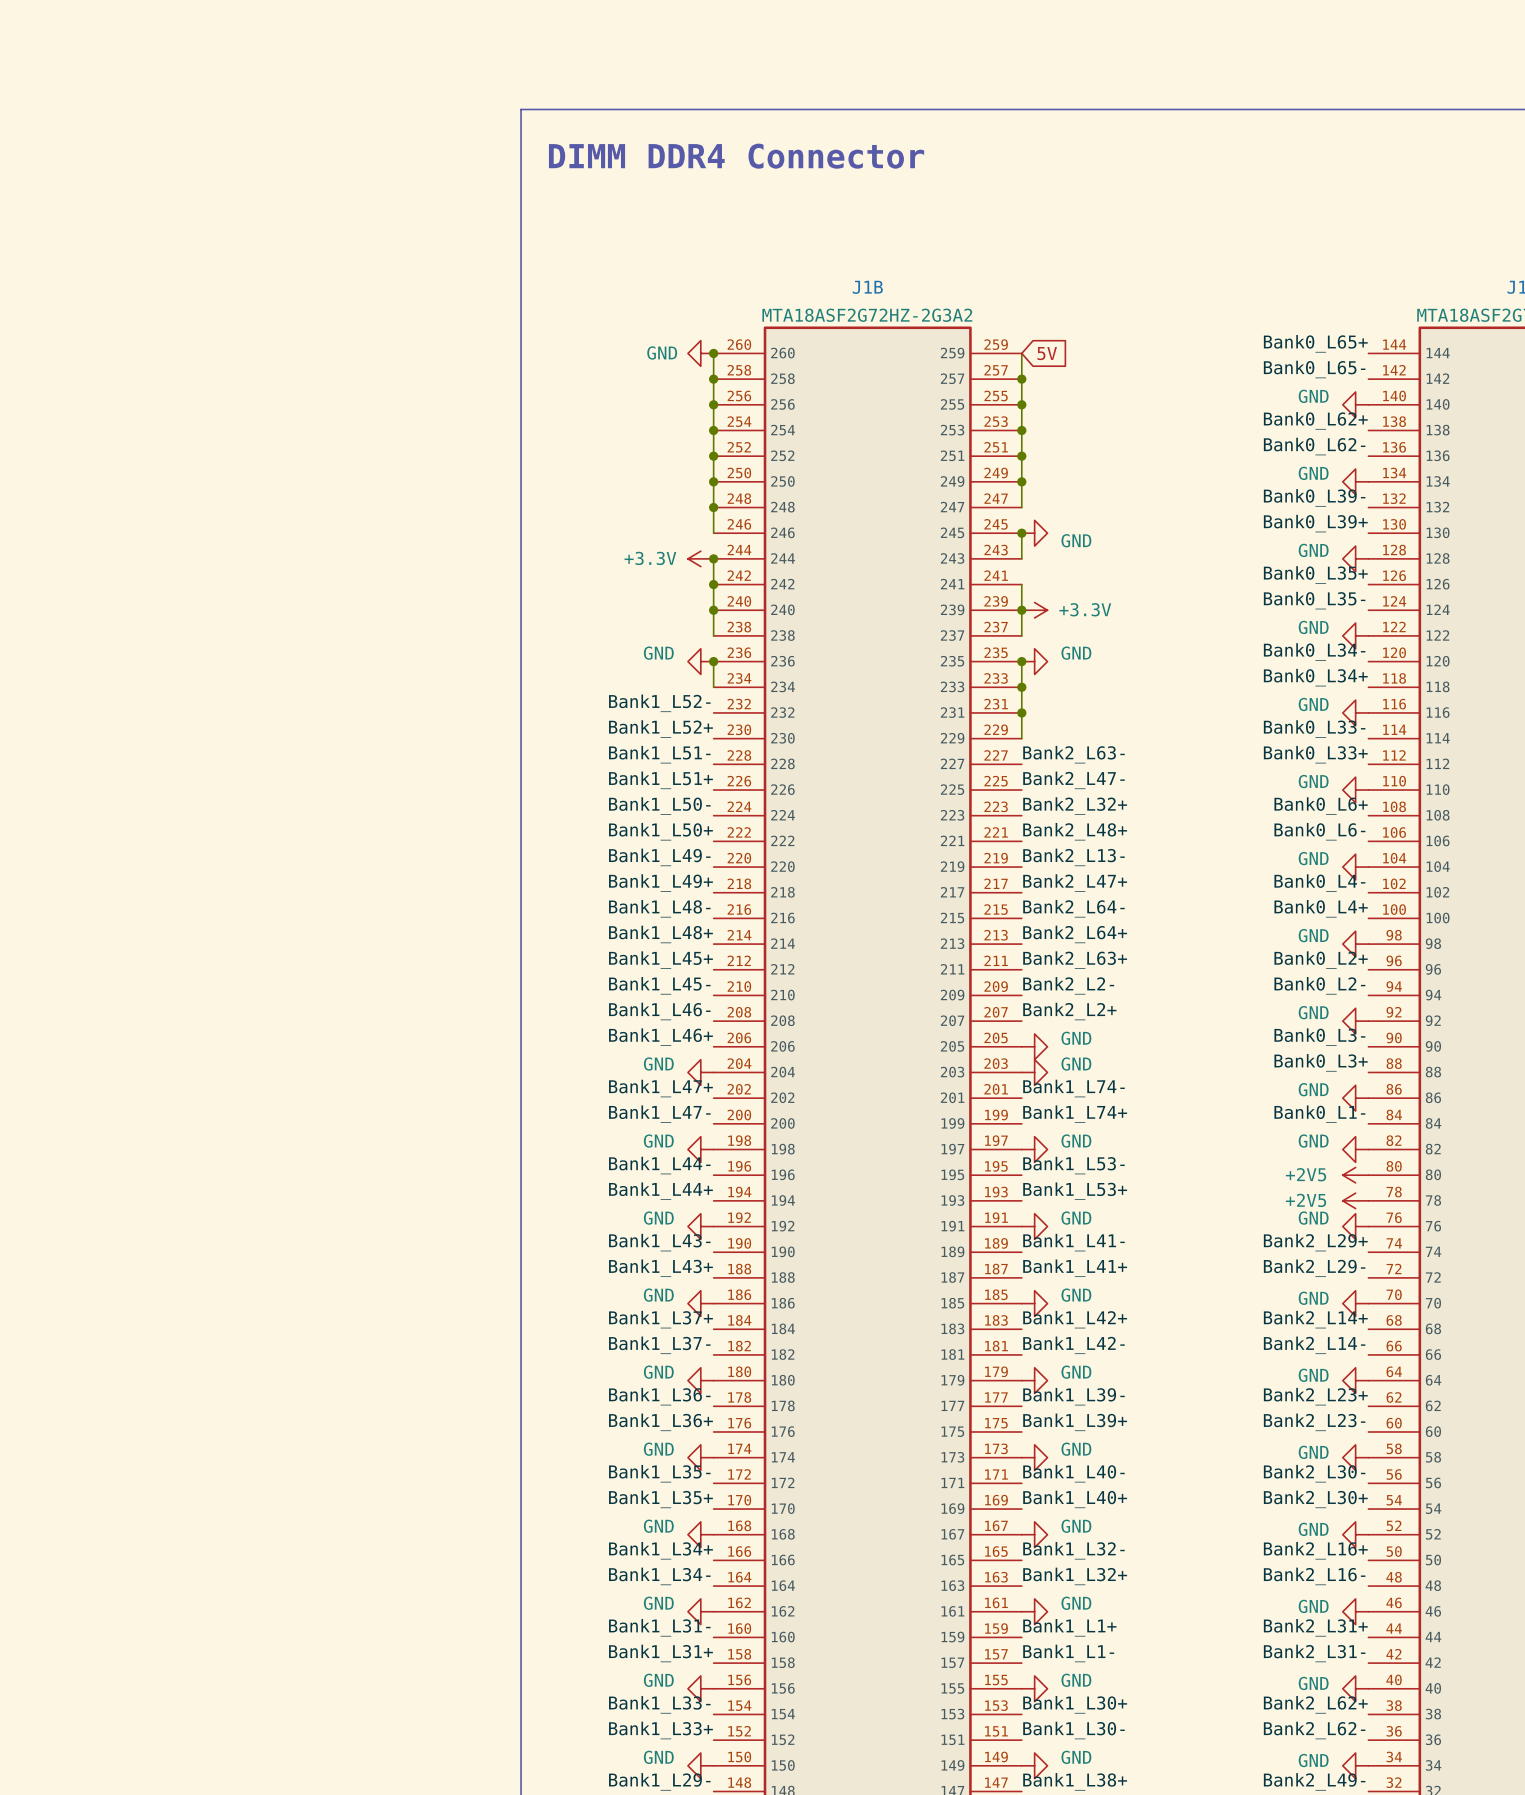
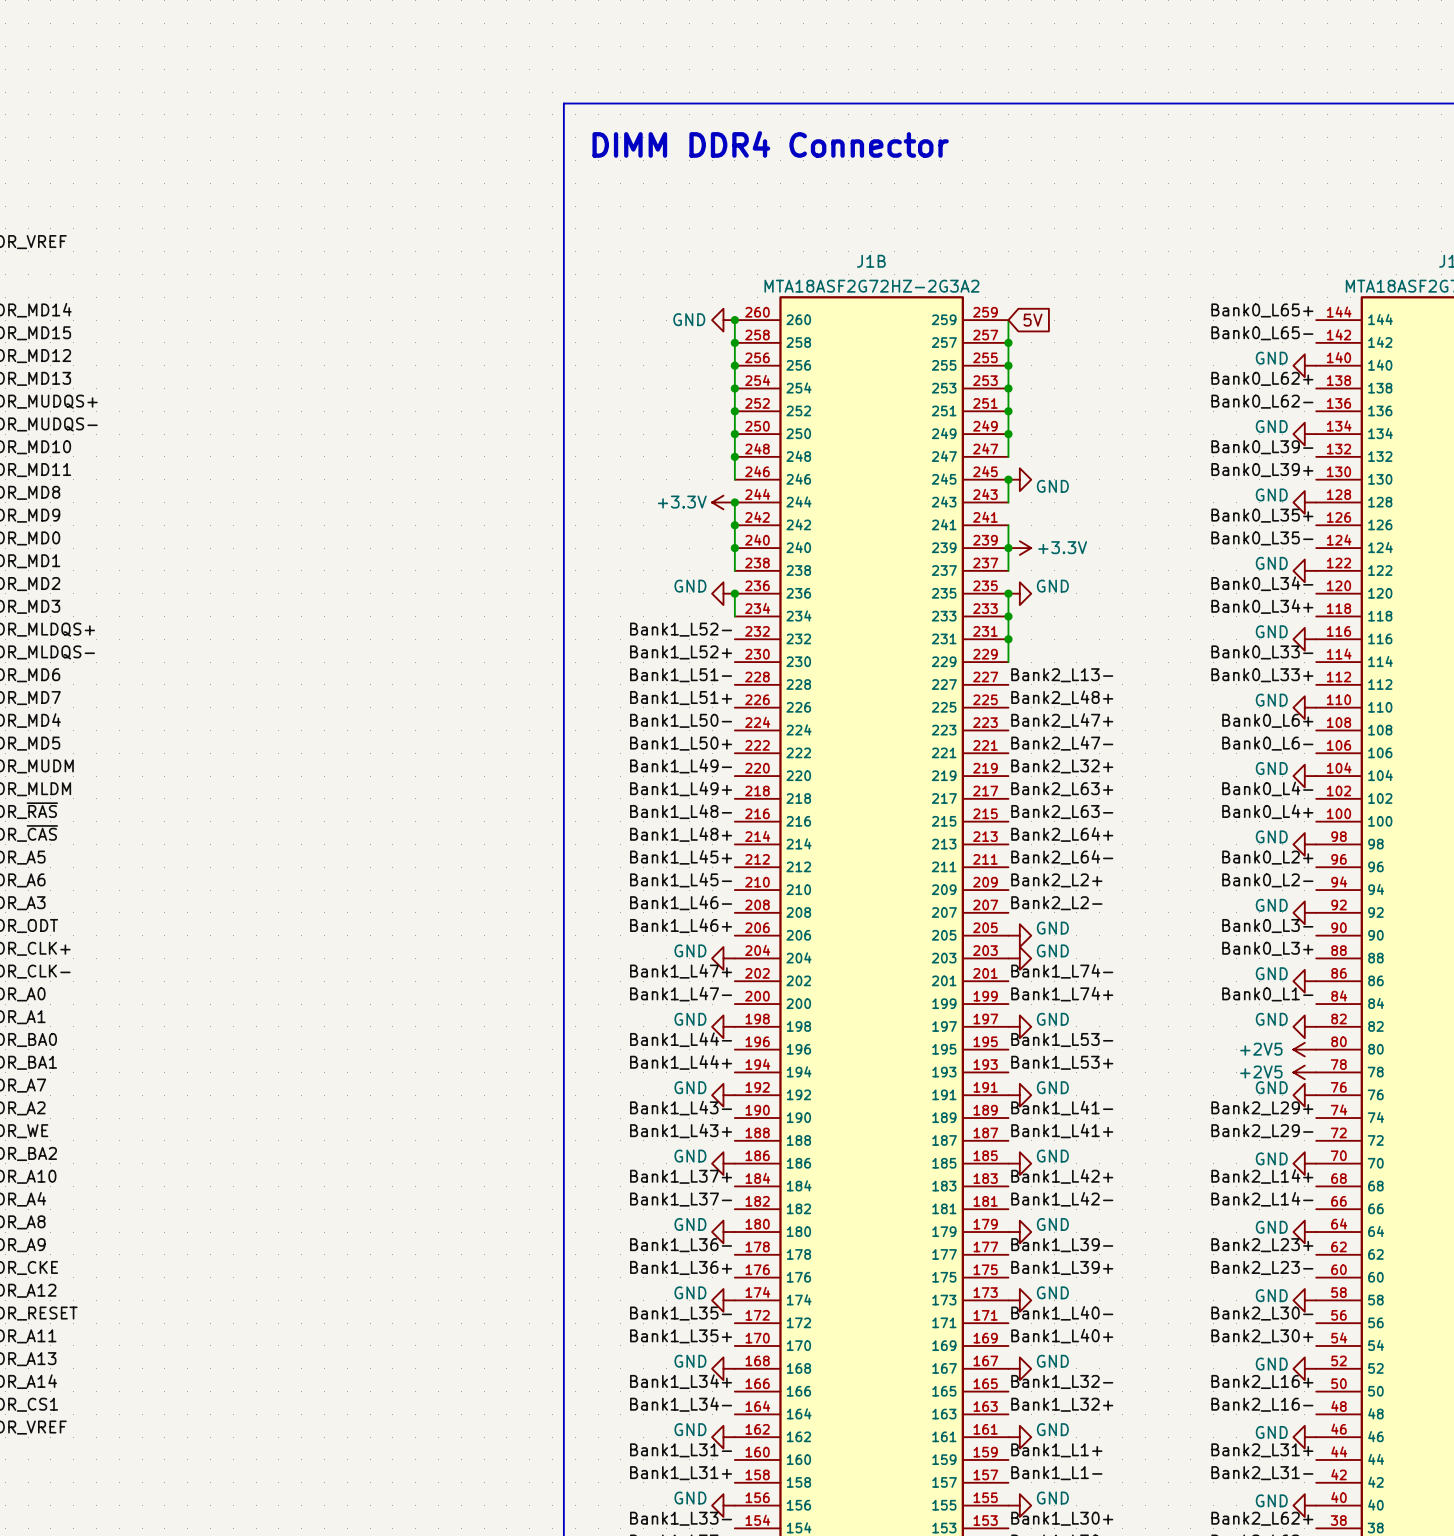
label: Bank2_L63- (1073, 754) -> Bank2_L13- (1062, 675)
label: Bank2_L47- (1073, 780) -> Bank2_L48+ (1062, 697)
label: Bank2_L32+ (1075, 806) -> Bank2_L47+ (1062, 720)
label: Bank2_L48+ (1075, 831) -> Bank2_L47- (1062, 743)
label: Bank2_L13- (1073, 857) -> Bank2_L32+ (1062, 766)
label: Bank2_L47+ (1075, 883) -> Bank2_L63+ (1062, 789)
label: Bank2_L64- (1073, 908) -> Bank2_L63- (1062, 812)
label: Bank2_L63+ (1075, 960) -> Bank2_L64- (1062, 857)
label: Bank2_L2- (1068, 985) -> Bank2_L2+ (1056, 880)
label: Bank2_L2+ (1069, 1011) -> Bank2_L2- (1056, 903)

